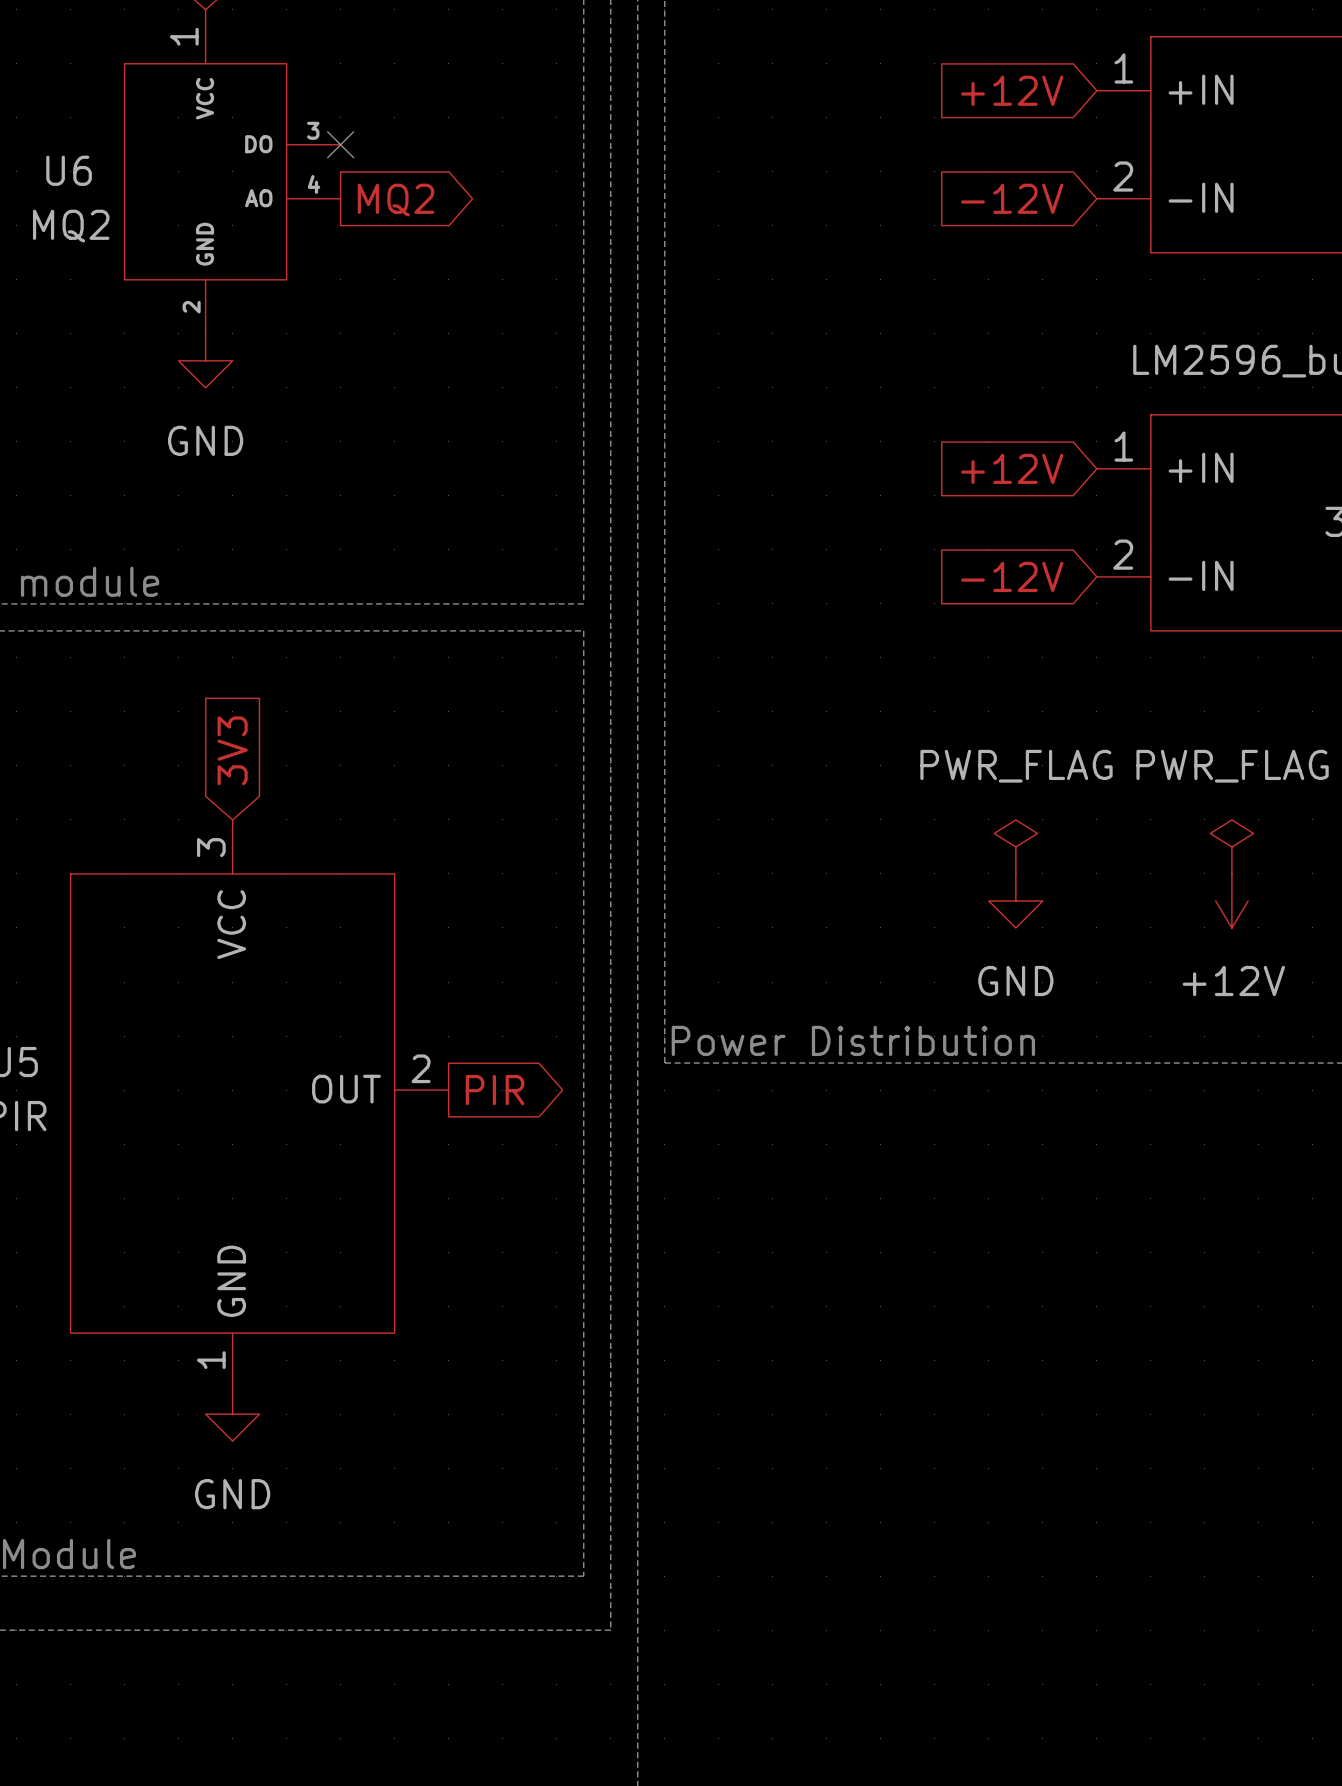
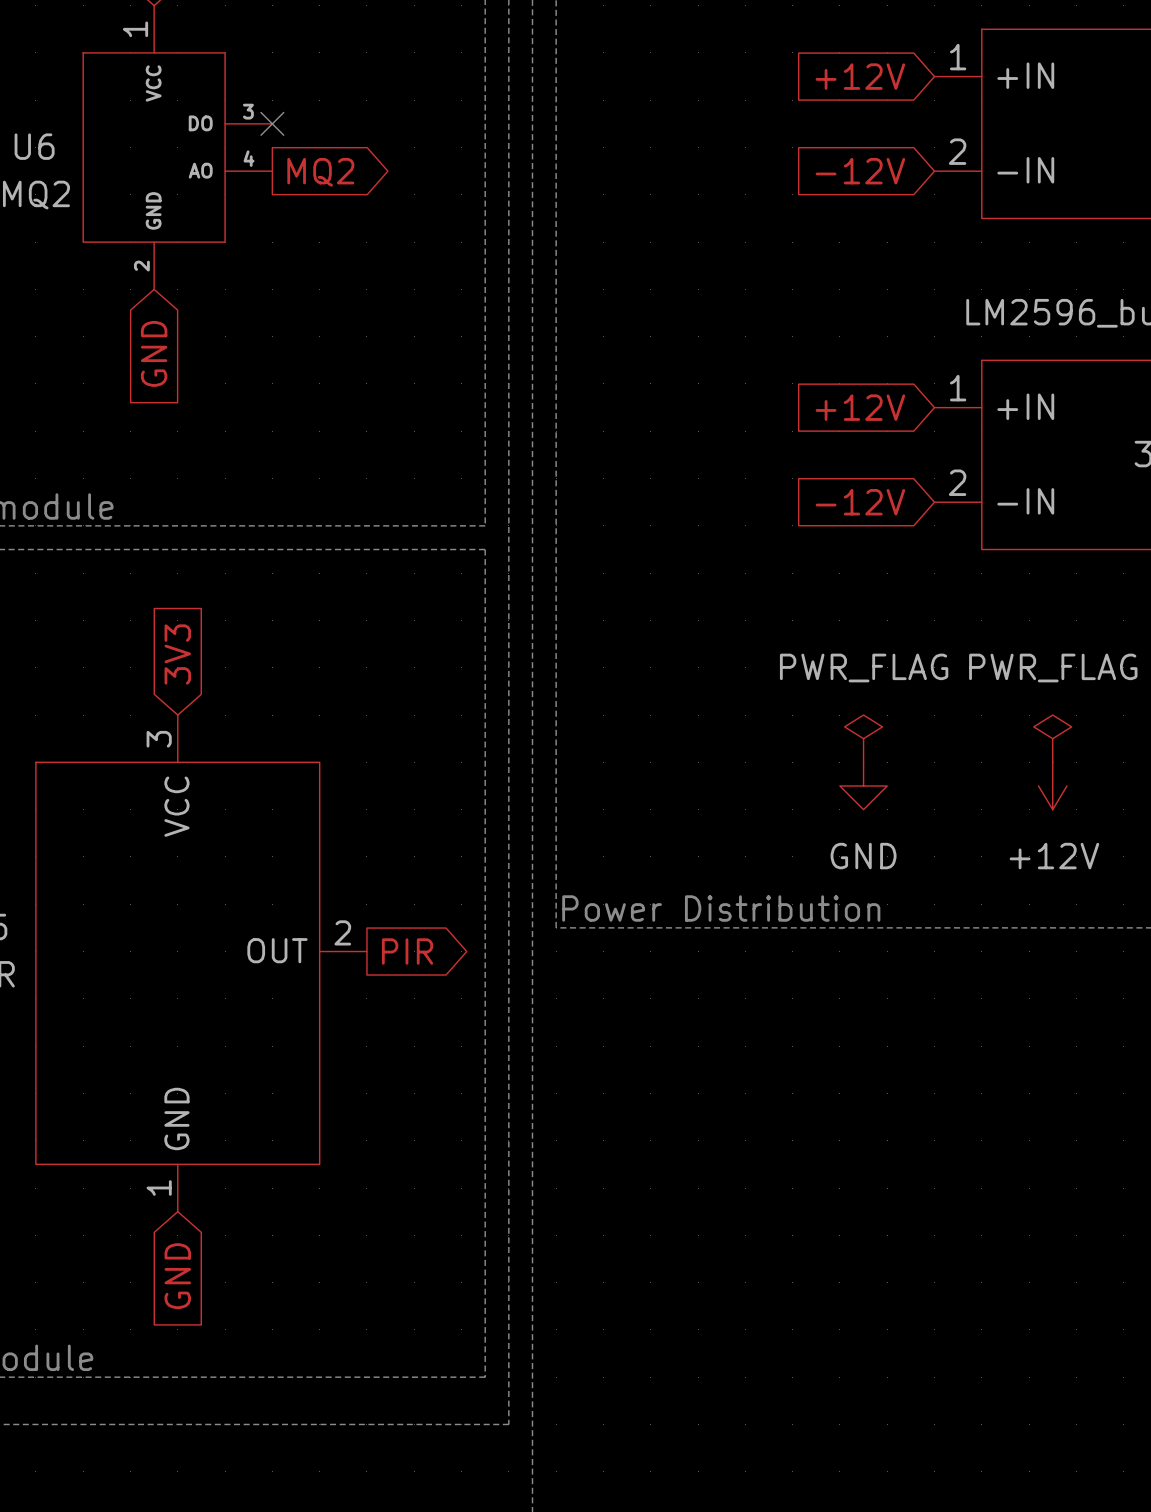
power symbol: GND (205, 360) -> none
global label: none -> GND (154, 353)
power symbol: GND (232, 1414) -> none
global label: none -> GND (177, 1276)

